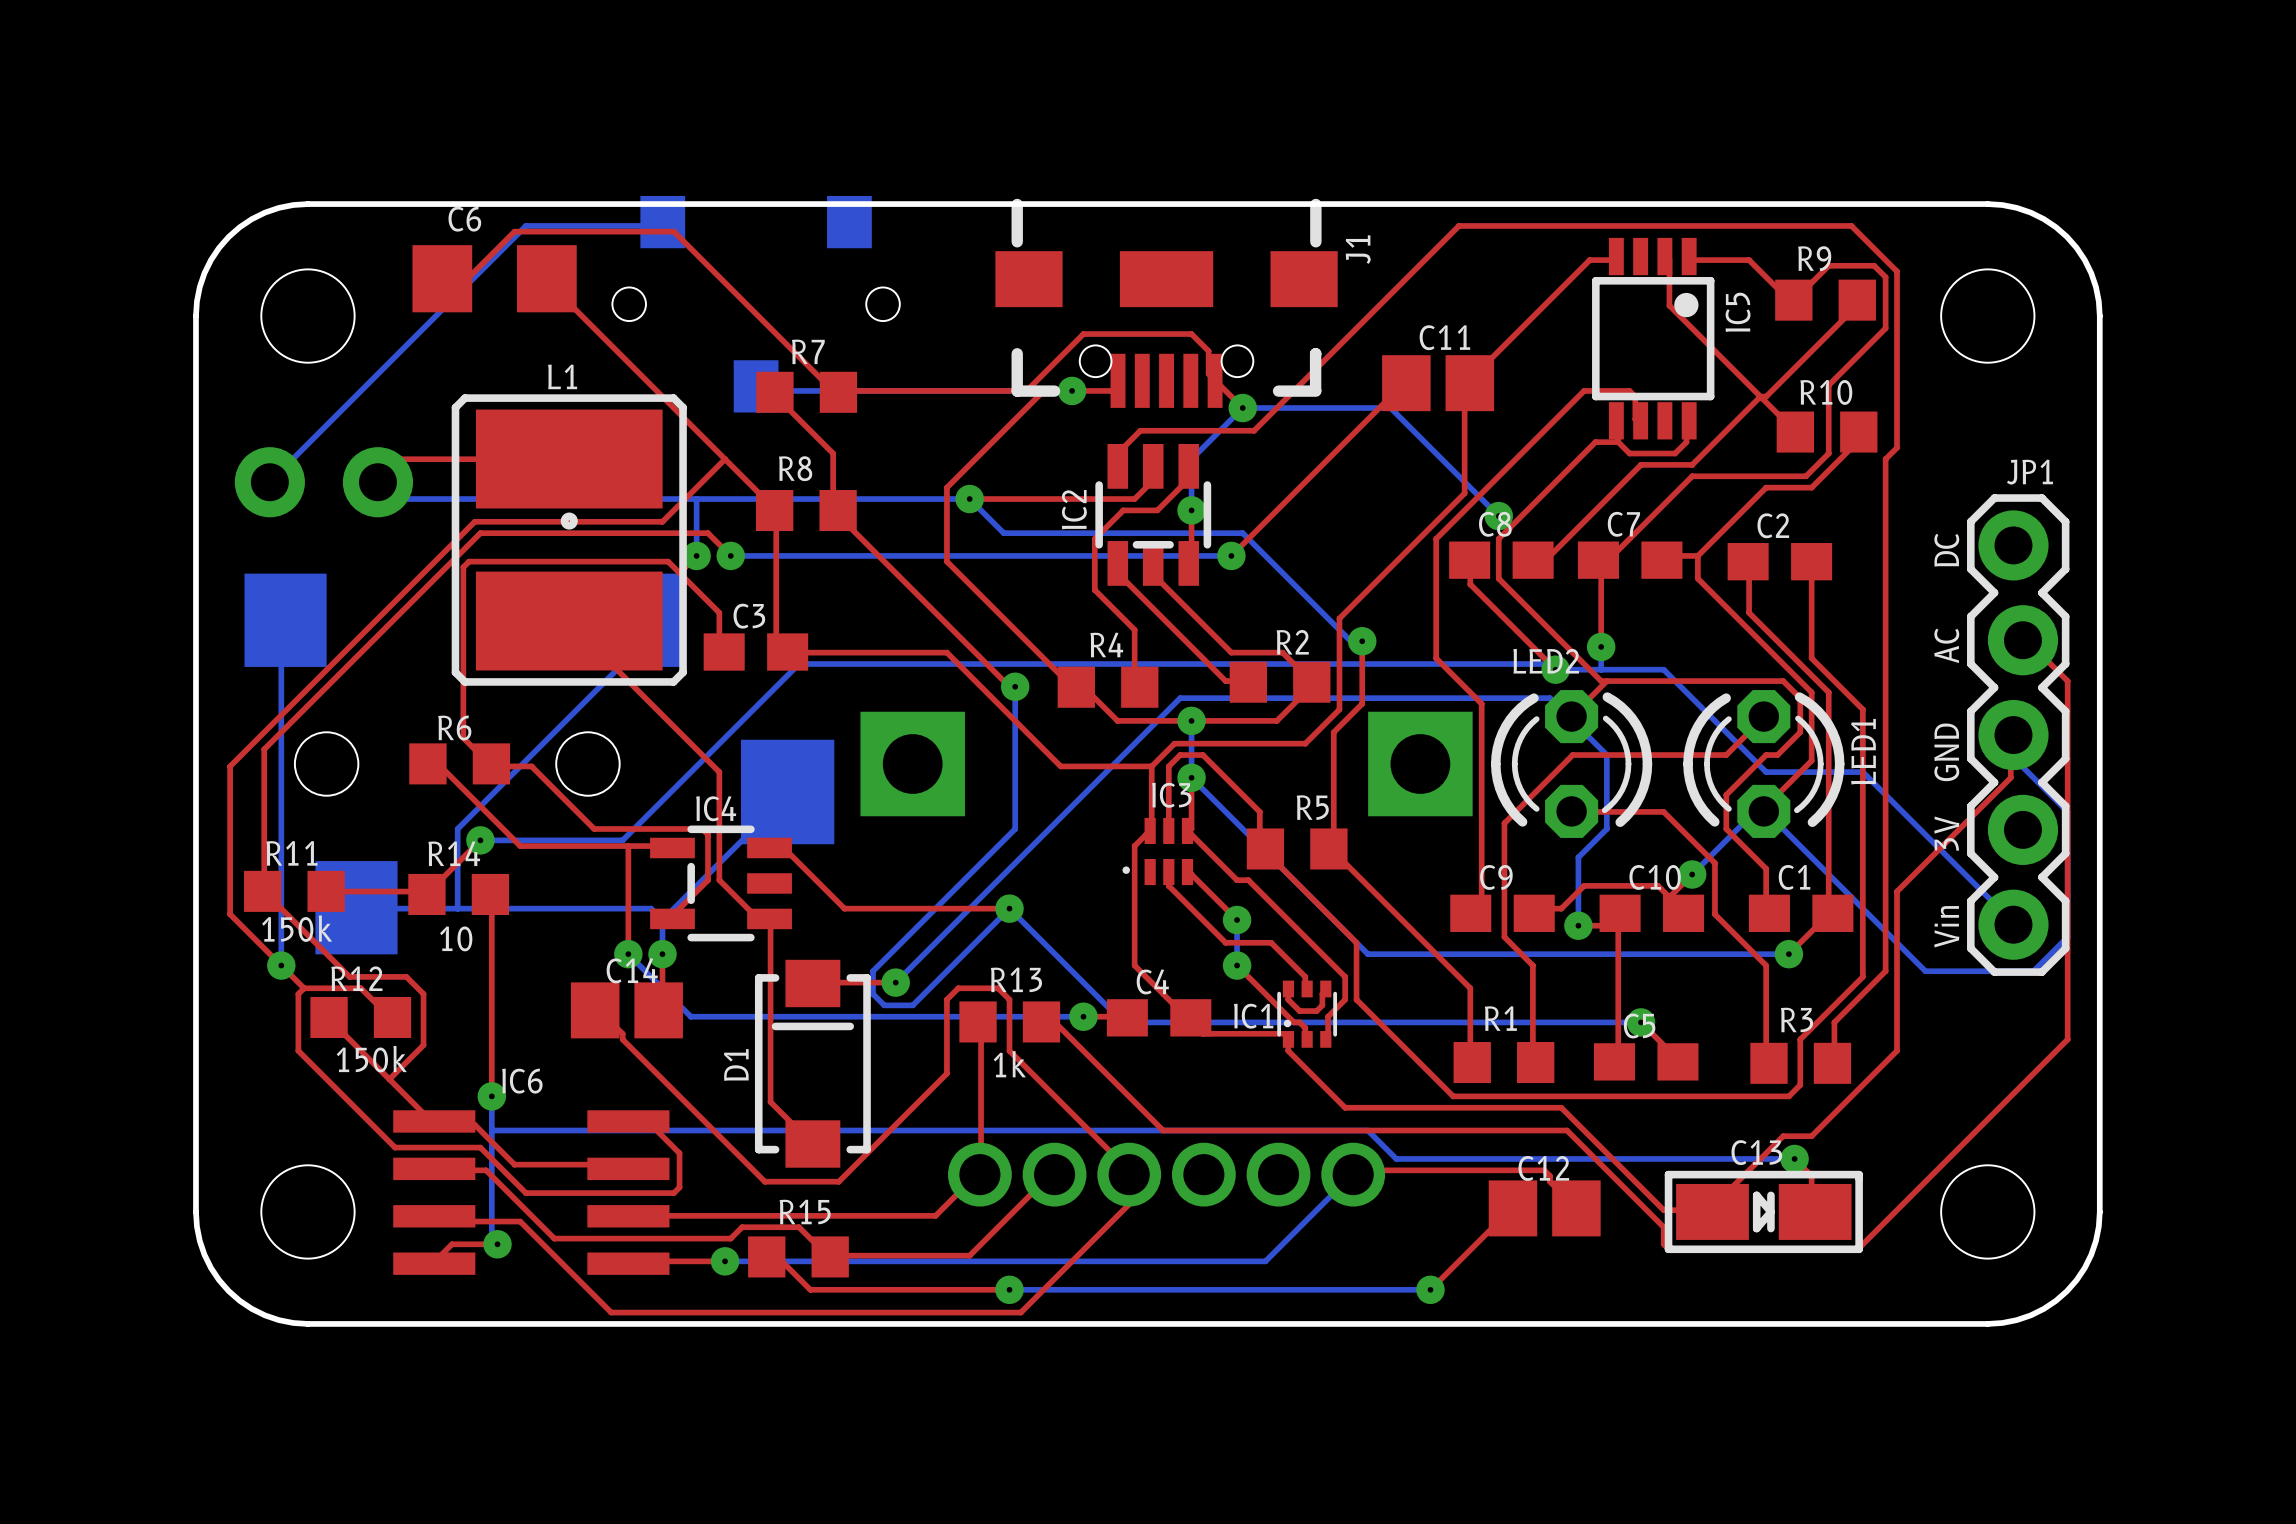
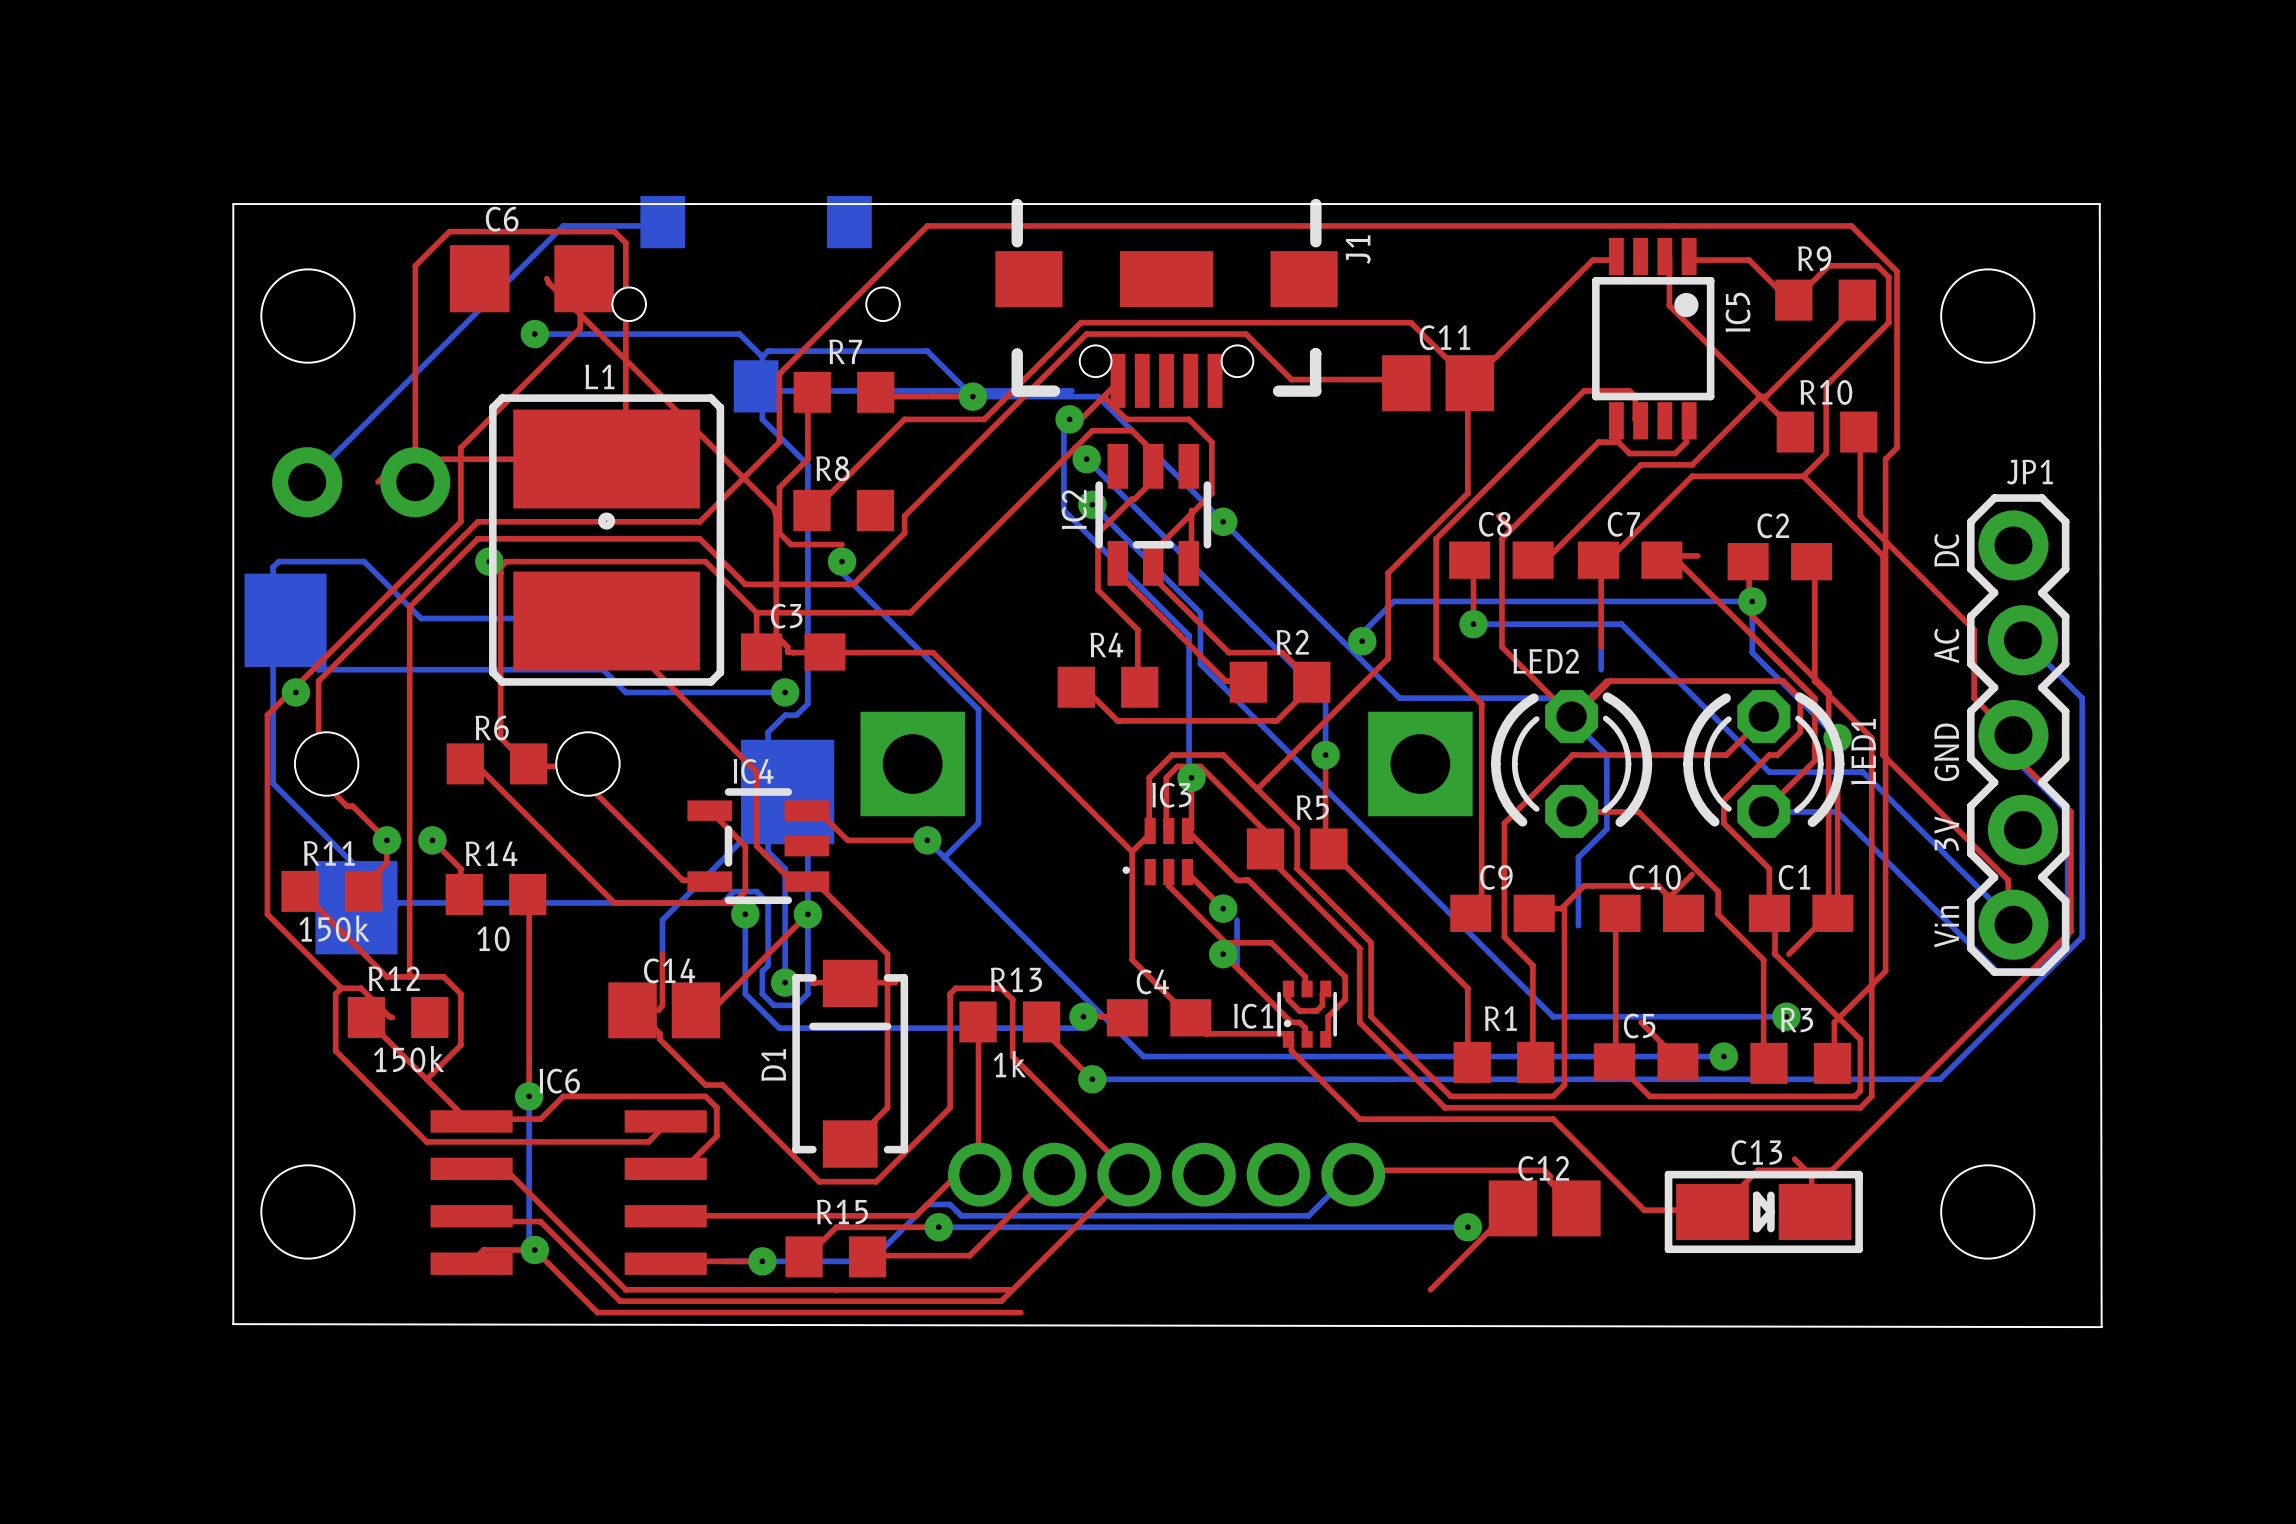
board edge: (307, 204) (278, 207) (265, 212) (239, 227) (228, 236) (219, 247) (204, 273) (199, 287) (195, 316) (196, 1226) (199, 1240) (210, 1267) (219, 1280) (239, 1300) (251, 1308) (278, 1320) (307, 1323) (1987, 1323) (2016, 1320) (2043, 1308) (2066, 1291) (2084, 1267) (2095, 1240) (2099, 1211) (2099, 316) (2095, 287) (2091, 273) (2076, 247) (2066, 236) (2055, 227) (2030, 212) (2016, 207) (1987, 204) -> (307, 204) (233, 204) (233, 1324) (2101, 1327) (2099, 204) (1987, 204)
board edge width: thick (307, 204) (1987, 204) -> thin (307, 204) (1987, 204)
bottom track: (563, 225) (525, 225) (269, 481) -> (563, 225) (307, 481)
top track: (1458, 225) (1254, 430) (1140, 430) (1123, 447) (1123, 464) (1117, 466) -> (1458, 225) (927, 225) (779, 373) (779, 442) (699, 521) (662, 521)
top track: (514, 231) (469, 277) (442, 278) -> (514, 231) (449, 231) (415, 265) (415, 481)
top track: (614, 231) (673, 231) (833, 390) (838, 392) (1026, 390) (1083, 334) (1086, 334) -> (614, 231) (625, 243) (625, 436) (608, 453) (606, 459)
top track: (1592, 260) (1589, 260) (1470, 379) (1469, 383) (1464, 385) (1464, 493) (1339, 618) (1339, 709) (1305, 743) (1174, 743) (1151, 766) -> (1592, 260) (1469, 383)
top track: (1874, 265) (1885, 277) (1885, 328) (1828, 385) (1828, 453) (1805, 476) (1803, 476) -> (1874, 265) (1877, 265) (1888, 277) (1888, 322) (1826, 385) (1826, 453) (1803, 476) (1883, 555) (1883, 755) (2008, 880) (2008, 920) (2013, 924)
C6 position: (494, 278) -> (531, 278)
top track: none -> (584, 278) (580, 282) (580, 328) (460, 447) (460, 521) (267, 715) (267, 914) (341, 988) (335, 993) (335, 1050) (426, 1141) (648, 1141) (665, 1124) (665, 1121)
bottom track: none -> (534, 334) (739, 334) (762, 356)
via: none -> (534, 334)
top track: none -> (1086, 334) (904, 516) (904, 533) (853, 584) (745, 584) (699, 538) (477, 538) (409, 607) (409, 976)
top track: (1191, 334) (1208, 351) (1208, 373) (1242, 408) -> (1191, 334) (1245, 334) (1291, 379) (1405, 379) (1406, 383)
bottom track: none -> (762, 356) (762, 419) (807, 464) (807, 703) (796, 715) (785, 715) (768, 732) (768, 851) (785, 868) (785, 982)
top track: (1118, 380) (1117, 385) (1111, 390) (1043, 390) (946, 487) (946, 561) (1072, 686) (1076, 687) (1077, 692) (1080, 692) -> (1118, 380) (1080, 419) (1069, 419)
top track: (1406, 383) (1402, 385) (1231, 555) -> none
top track: none -> (1469, 383) (1410, 322) (1080, 322) (984, 419) (904, 419) (811, 510)
top track: none -> (1469, 383) (1467, 385) (1467, 493) (1388, 572) (1388, 658) (1257, 789)
via position: (1072, 390) -> (1069, 419)
top track: (774, 392) (776, 396) (833, 453) (833, 510) (838, 510) (838, 516) (1009, 686) (1015, 686) -> none
R7 position: (806, 392) -> (844, 392)
top track: none -> (812, 392) (807, 396) (807, 459) (779, 487) (779, 533) (790, 544) (842, 544)
top track: none -> (875, 392) (876, 396) (972, 396)
via: none -> (972, 396)
via: (1242, 408) -> none
bottom track: none -> (1063, 419) (1063, 510) (1189, 635) (1189, 789)
top track: (1858, 432) (1862, 436) (1811, 487) (1766, 487) (1697, 555) (1697, 578) (1811, 692) (1811, 760) (1766, 806) (1763, 811) -> (1661, 560) (1678, 561) (1814, 698) (1814, 760) (1763, 811)
top track: none -> (1858, 432) (1860, 516) (1974, 629) (1974, 698) (2008, 732) (2013, 735) (2013, 755) (2070, 811) (2070, 931) (1831, 1170) (1757, 1170) (1718, 1210) (1712, 1211) (1712, 1210) (1709, 1210)
top track: (1598, 442) (1595, 442) (1498, 538) (1498, 578) (1601, 681) (1610, 681) -> (1598, 442) (1501, 538) (1501, 646) (1571, 716) (1575, 715) (1610, 681)
top track: (725, 459) (662, 521) -> none
bottom track: none -> (1086, 459) (1325, 698) (1325, 755)
via: none -> (1086, 459)
top track: none -> (1153, 466) (1149, 464) (1149, 447) (1132, 430) (1092, 430) (910, 612) (756, 612)
top track: (1188, 466) (1185, 470) (1185, 481) (1157, 510) (1123, 510) (1094, 538) (1094, 590) (1134, 629) (1134, 686) (1139, 687) -> (1132, 499) (1098, 533) (1098, 590) (1137, 629) (1137, 686) (1139, 687)
part position: (323, 482) -> (361, 482)
bottom track: (377, 482) (378, 487) (389, 499) (969, 499) (1003, 533) (1242, 533) (1350, 641) (1362, 641) -> none
bottom track: (696, 499) (696, 555) -> none
top track: (969, 499) (1132, 499) -> none
via: (969, 499) -> none
bottom track: none -> (1092, 504) (1200, 612) (1200, 664) (1553, 1016) (1786, 1016)
via: none -> (1092, 504)
R8 position: (806, 510) -> (843, 510)
bottom track: (1191, 510) (1191, 459) (1242, 408) (1390, 408) (1498, 516) -> none
via: (1191, 510) -> none
via: (1498, 516) -> none
top track: (477, 521) (474, 521) (230, 766) (230, 914) (304, 988) -> (477, 521) (318, 681) (318, 777) (347, 806) (352, 806) (386, 840) (386, 863) (364, 885) (363, 891)
via: none -> (1223, 521)
L1 position: (569, 540) -> (606, 540)
via: (696, 555) -> none
top track: (730, 555) (707, 533) (480, 533) (264, 749) (262, 891) (349, 976) (386, 976) -> (300, 891) (386, 976)
bottom track: (730, 555) (1231, 555) -> none
via: (730, 555) -> none
via: (1231, 555) -> none
top track: (1469, 560) (1470, 584) (1555, 669) -> (1469, 560) (1473, 561) (1473, 624)
via: none -> (489, 561)
top track: (506, 561) (469, 561) (463, 567) (463, 737) (491, 763) (491, 766) (529, 766) -> (506, 561) (500, 567) (500, 737) (528, 763) (529, 766)
top track: (668, 561) (719, 612) (719, 646) (724, 652) -> (668, 561) (705, 561) (756, 612)
bottom track: none -> (842, 561) (842, 572) (978, 709) (978, 823) (944, 857)
via: none -> (842, 561)
top track: (1811, 561) (1811, 658) (1862, 709) (1862, 976) (1800, 1039) (1800, 1085) (1788, 1096) -> (1811, 561) (1814, 567) (1814, 681) (1871, 737) (1871, 1096) (1860, 1107) (1561, 1107)
top track: (1153, 563) (1157, 567) (1157, 578) (1231, 652) -> (1103, 396) (1126, 419) (1189, 419) (1211, 442) (1211, 493) (1154, 550) (1153, 563) (1154, 578) (1228, 652) (1231, 652)
via: none -> (1752, 601)
top track: none -> (756, 612) (756, 646) (761, 652)
bottom track: (285, 620) (281, 624) (281, 965) -> none
bottom track: none -> (322, 620) (318, 624) (318, 669) (603, 669) (625, 692) (785, 692)
bottom track: (632, 620) (628, 624) (628, 658) (457, 829) (457, 908) -> none
bottom track: none -> (670, 620) (665, 618) (421, 618) (364, 561) (278, 561) (273, 567) (273, 783) (392, 902) (393, 907) (398, 902) (722, 902) (733, 891) (756, 891) (768, 902) (768, 965) (762, 971) (762, 993) (773, 1005) (796, 1005) (807, 993) (807, 811) (824, 794) (824, 791)
top track: (569, 621) (719, 772) (719, 880) (753, 914) (764, 914) (770, 920) (770, 1102) (812, 1144) -> none
top track: none -> (606, 621) (756, 772) (756, 846) (790, 880) (806, 881) (807, 885) (819, 885) (887, 954) (887, 1107) (850, 1144)
via: none -> (1473, 624)
bottom track: none -> (1365, 629) (1393, 601) (1752, 601) (1752, 652) (1837, 737)
top track: (2022, 640) (2027, 641) (2067, 681) (2067, 1039) (1857, 1249) (1669, 1249) (1663, 1244) (1663, 1227) (1567, 1130) (1163, 1130) (1055, 1022) (1041, 1021) -> (1092, 1079) (1046, 1033) (1046, 1022) (1041, 1021)
bottom track: none -> (2022, 640) (2082, 698) (2082, 937) (1940, 1079) (1092, 1079)
top track: (1362, 641) (1362, 703) (1333, 732) (1333, 846) (1328, 848) (1470, 988) (1470, 1062) (1472, 1062) -> (1325, 755) (1325, 846) (1467, 988) (1467, 1062) (1472, 1062)
via: (1601, 646) -> none
C3 position: (755, 652) -> (793, 652)
top track: (933, 652) (946, 652) (1060, 766) (1151, 766) -> (933, 652) (1132, 851)
via: (1555, 669) -> none
bottom track: (1015, 686) (1015, 829) (872, 971) (872, 993) (884, 1005) (912, 1005) (1009, 908) (1123, 1022) (1640, 1022) -> none
via: (1015, 686) -> none
via: none -> (295, 692)
via: none -> (785, 692)
bottom track: (1399, 698) (1180, 698) (895, 982) -> (1399, 698) (1098, 396) (972, 396) (927, 351) (768, 351) (762, 356)
bottom track: (1191, 720) (1191, 777) (1367, 954) (1788, 954) -> none
via: (1191, 720) -> none
top track: (2013, 735) (2010, 737) (2010, 777) (1897, 891) (1897, 1050) (1811, 1136) (1783, 1136) (1709, 1210) (1712, 1211) -> none
top track: none -> (1837, 737) (1837, 908) (1832, 913)
via: none -> (1837, 737)
top track: (1180, 755) (1168, 766) (1168, 830) -> (1180, 755) (1172, 755) (1149, 777) (1150, 830) (1149, 834) (1132, 851)
top track: (1202, 755) (1259, 811) (1259, 846) (1265, 848) (1265, 851) (1356, 942) (1356, 999) (1453, 1096) -> (1202, 755) (1223, 755) (1297, 829) (1297, 868) (1371, 942) (1371, 1016) (1450, 1096) (1453, 1096)
via: none -> (1325, 755)
top track: (1769, 755) (1766, 755) (1726, 794) (1726, 829) (1766, 868) (1766, 908) (1769, 913) -> (1769, 755) (1723, 800) (1723, 823) (1769, 868) (1769, 913) (1775, 914) (1775, 954) (1860, 1039) (1860, 1090) (1854, 1096) (1788, 1096)
top track: (427, 763) (429, 766) (440, 766) (520, 846) (668, 846) (672, 847) -> none
R6 position: (459, 763) -> (497, 763)
top track: none -> (465, 763) (466, 766) (477, 766) (614, 902) (733, 902)
top track: (531, 766) (594, 829) (702, 829) (707, 834) (707, 880) (673, 914) (672, 918) -> (531, 766) (568, 766) (682, 880) (709, 881)
top track: (1151, 766) (1151, 829) (1134, 846) (1134, 965) (1185, 1016) (1190, 1017) (1191, 1022) (1202, 1033) (1206, 1033) -> (1132, 851) (1132, 959) (1206, 1033)
bottom track: (1769, 772) (1766, 772) (1663, 669) (1555, 669) (1549, 664) (799, 664) (622, 840) (480, 840) -> (1769, 772) (1621, 624) (1473, 624)
top track: none -> (709, 810) (745, 846) (745, 891) (733, 902)
top track: none -> (806, 810) (819, 811) (847, 840) (927, 840)
top track: (1638, 811) (1663, 811) (1714, 863) (1714, 914) (1766, 965) (1766, 1062) (1769, 1063) -> (1638, 811) (1718, 891) (1718, 914) (1763, 959) (1763, 1062) (1769, 1063)
via: none -> (386, 840)
top track: none -> (432, 840) (460, 868) (460, 891) (464, 894)
via: none -> (432, 840)
top track: (480, 840) (426, 894) (423, 891) (326, 891) -> none
via: (480, 840) -> none
bottom track: none -> (927, 840) (1143, 1056) (1723, 1056)
via: none -> (927, 840)
top track: (628, 846) (628, 954) -> none
top track: (769, 847) (770, 851) (787, 851) (844, 908) (1009, 908) -> none
top track: (1187, 872) (1237, 920) -> (1187, 872) (1223, 908)
bottom track: (1692, 874) (1760, 806) (1925, 971) (1996, 971) -> (1763, 811) (1837, 811) (1996, 971)
via: (1692, 874) -> none
IC4 position: (721, 883) -> (758, 846)
R11 position: (294, 891) -> (331, 891)
R14 position: (458, 894) -> (496, 894)
top track: (490, 894) (491, 1096) -> (527, 894) (529, 1096)
bottom track: (356, 907) (651, 908) (662, 920) -> none
via: (1009, 908) -> none
top track: none -> (1564, 908) (1564, 1085) (1553, 1096)
bottom track: none -> (745, 914) (745, 993) (779, 1028) (1080, 1028)
via: none -> (745, 914)
top track: none -> (807, 914) (716, 1005) (699, 1005) (696, 1010)
via: none -> (807, 914)
via position: (1237, 920) -> (1223, 908)
top track: (1578, 925) (1618, 925) (1620, 913) (1618, 914) (1618, 1056) (1614, 1061) -> none
via: (1578, 925) -> none
bottom track: (628, 954) (690, 1016) (1083, 1016) -> none
via: (628, 954) -> none
via: (662, 954) -> none
via: (1788, 954) -> none
via: (281, 965) -> none
top track: (1237, 965) (1293, 1022) -> (1223, 954) (1291, 1022) (1293, 1022)
via position: (1237, 965) -> (1223, 954)
top track: (406, 976) (423, 993) (423, 1045) (389, 1079) -> (406, 976) (443, 976) (460, 993) (460, 1045) (426, 1079)
via: none -> (785, 982)
via: (895, 982) -> none
top track: (304, 988) (341, 988) -> (725, 1261) (762, 1261)
top track: (304, 988) (298, 993) (298, 1050) (395, 1147) (480, 1147) (525, 1193) (673, 1193) (679, 1187) (679, 1153) (651, 1124) (634, 1124) (628, 1121) -> none
top track: (958, 988) (946, 999) (946, 1073) (838, 1181) -> (958, 988) (950, 993) (950, 1107) (876, 1181) (838, 1181)
top track: (998, 988) (1009, 999) (1009, 1050) (1128, 1170) (1128, 1204) (1020, 1312) -> (998, 988) (1001, 988) (1012, 999) (1012, 1056) (1129, 1174) (1001, 1301) (620, 1301) (540, 1221) (520, 1221)
top track: (595, 1010) (599, 1011) (622, 1033) (622, 1039) (764, 1181) (819, 1181) -> (632, 1010) (637, 1011) (659, 1033) (659, 1039) (705, 1085) (722, 1085) (819, 1181)
C14 position: (626, 1010) -> (664, 1010)
via: none -> (1786, 1016)
top track: (329, 1017) (429, 1119) (434, 1121) (434, 1124) (474, 1124) (514, 1164) (628, 1164) (628, 1168) -> none
R12 position: (360, 1017) -> (398, 1017)
top track: none -> (366, 1017) (466, 1119) (471, 1121) (472, 1119) (540, 1119) (563, 1096) (705, 1096) (716, 1107) (716, 1136) (688, 1164) (671, 1164) (665, 1168)
top track: (978, 1021) (981, 1022) (979, 1174) (975, 1176) (935, 1215) (915, 1215) -> (978, 1022) (979, 1174) (955, 1176) (915, 1215)
via: (1640, 1022) -> none
top track: (1288, 1039) (1288, 1050) (1345, 1107) (1445, 1107) -> (1168, 830) (1166, 829) (1166, 777) (1177, 766) (1200, 766) (1263, 829) (1263, 846) (1265, 848) (1263, 851) (1359, 948) (1359, 1022) (1445, 1107)
via: none -> (1723, 1056)
D1 position: (812, 1063) -> (850, 1063)
via: none -> (1092, 1079)
bottom track: (491, 1096) (491, 1238) (497, 1244) -> none
via position: (491, 1096) -> (529, 1096)
bottom track: none -> (529, 1096) (529, 1244) (534, 1249)
top track: (1553, 1096) (1649, 1096) -> (1620, 913) (1615, 914) (1614, 1061) (1649, 1096)
top track: (1561, 1107) (1663, 1210) -> (1285, 1033) (1288, 1039) (1291, 1039) (1291, 1050) (1359, 1119) (1553, 1119) (1644, 1210) (1663, 1210)
bottom track: (491, 1130) (1367, 1130) (1396, 1158) (1794, 1158) -> none
via: (1794, 1158) -> none
top track: (486, 1170) (554, 1238) (730, 1238) (742, 1227) (799, 1227) (830, 1256) (870, 1255) -> (486, 1170) (506, 1170) (625, 1289) (810, 1289)
bottom track: (1353, 1174) (1265, 1261) (870, 1261) -> (1353, 1174) (1348, 1176) (1308, 1215) (961, 1215) (950, 1204) (927, 1204) (870, 1261)
IC6 position: (531, 1192) -> (568, 1192)
top track: (520, 1221) (611, 1312) -> (471, 1263) (483, 1249) (534, 1249) (597, 1312) (611, 1312)
top track: none -> (938, 1227) (836, 1227) (807, 1255) (804, 1256)
bottom track: none -> (938, 1227) (1467, 1227)
top track: (497, 1244) (451, 1244) (434, 1263) -> none
via position: (497, 1244) -> (534, 1249)
top track: (766, 1256) (770, 1261) (781, 1261) (810, 1289) -> none
R15 position: (798, 1256) -> (835, 1256)
via position: (725, 1261) -> (762, 1261)
bottom track: (1009, 1289) (1430, 1289) -> none
via position: (1009, 1289) -> (938, 1227)
via position: (1430, 1289) -> (1467, 1227)

